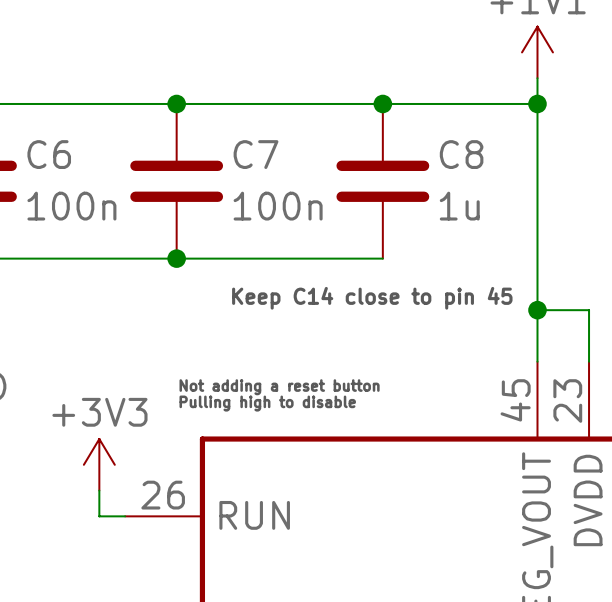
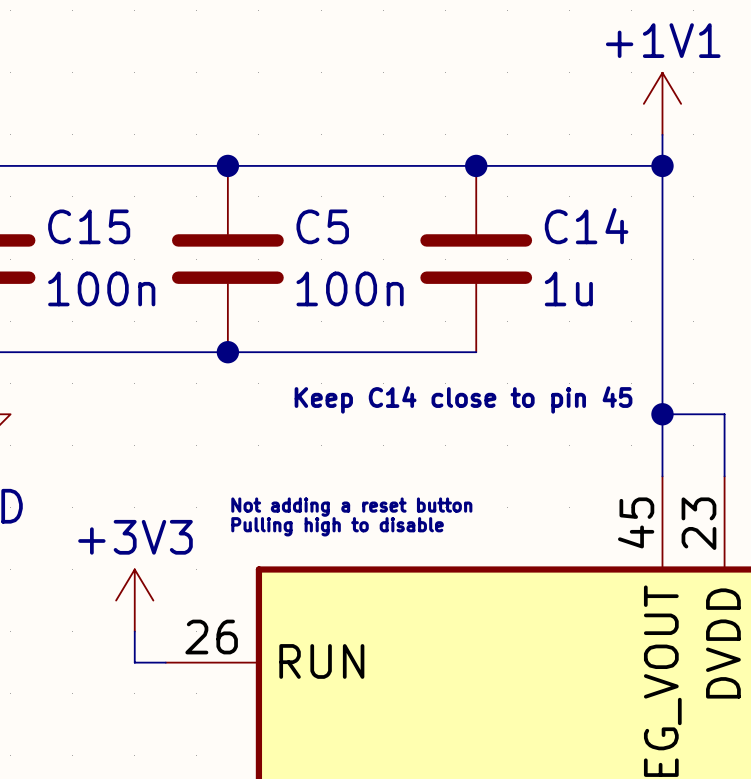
C6 name: C6 (49, 154) -> C15 (89, 226)
C7 name: C7 (256, 154) -> C5 (322, 226)
C8 name: C8 (461, 154) -> C14 (586, 226)

